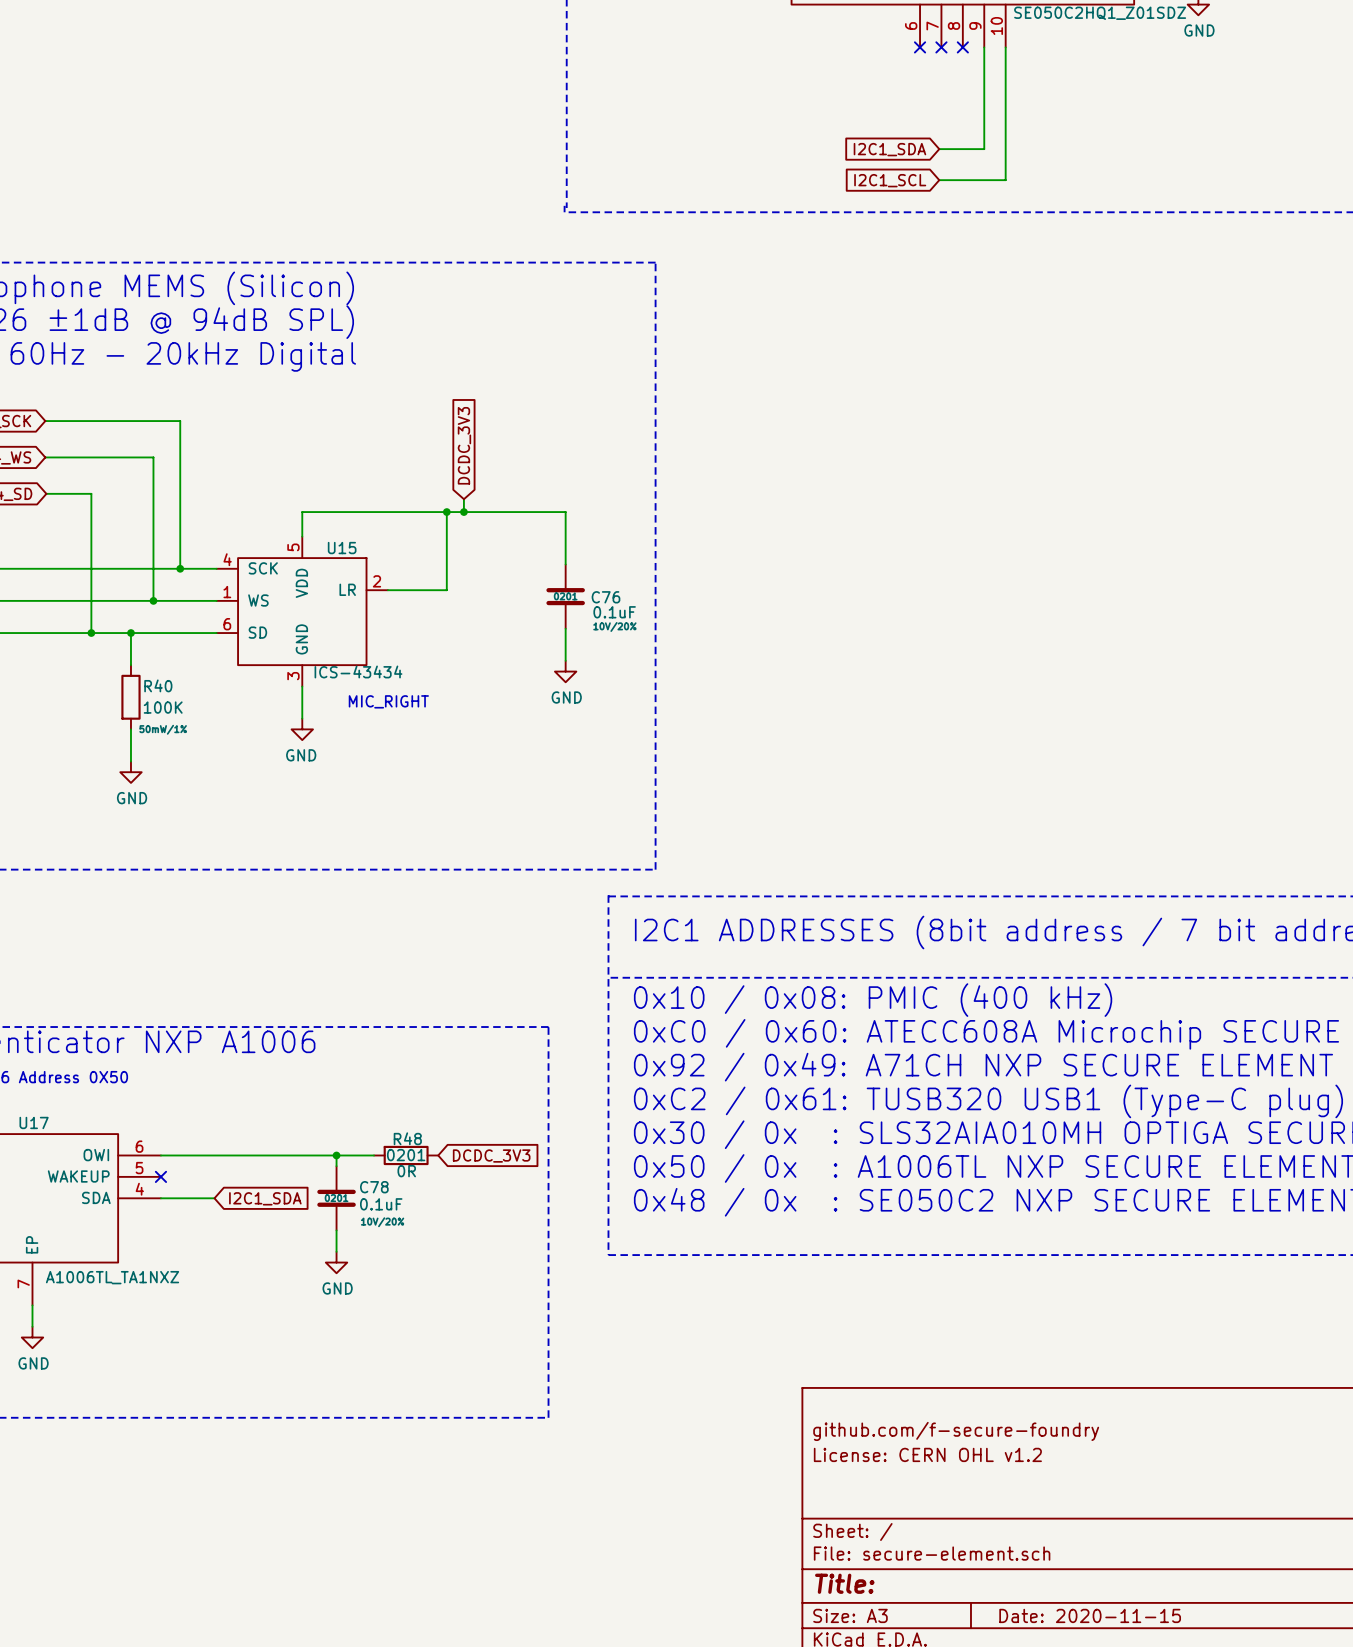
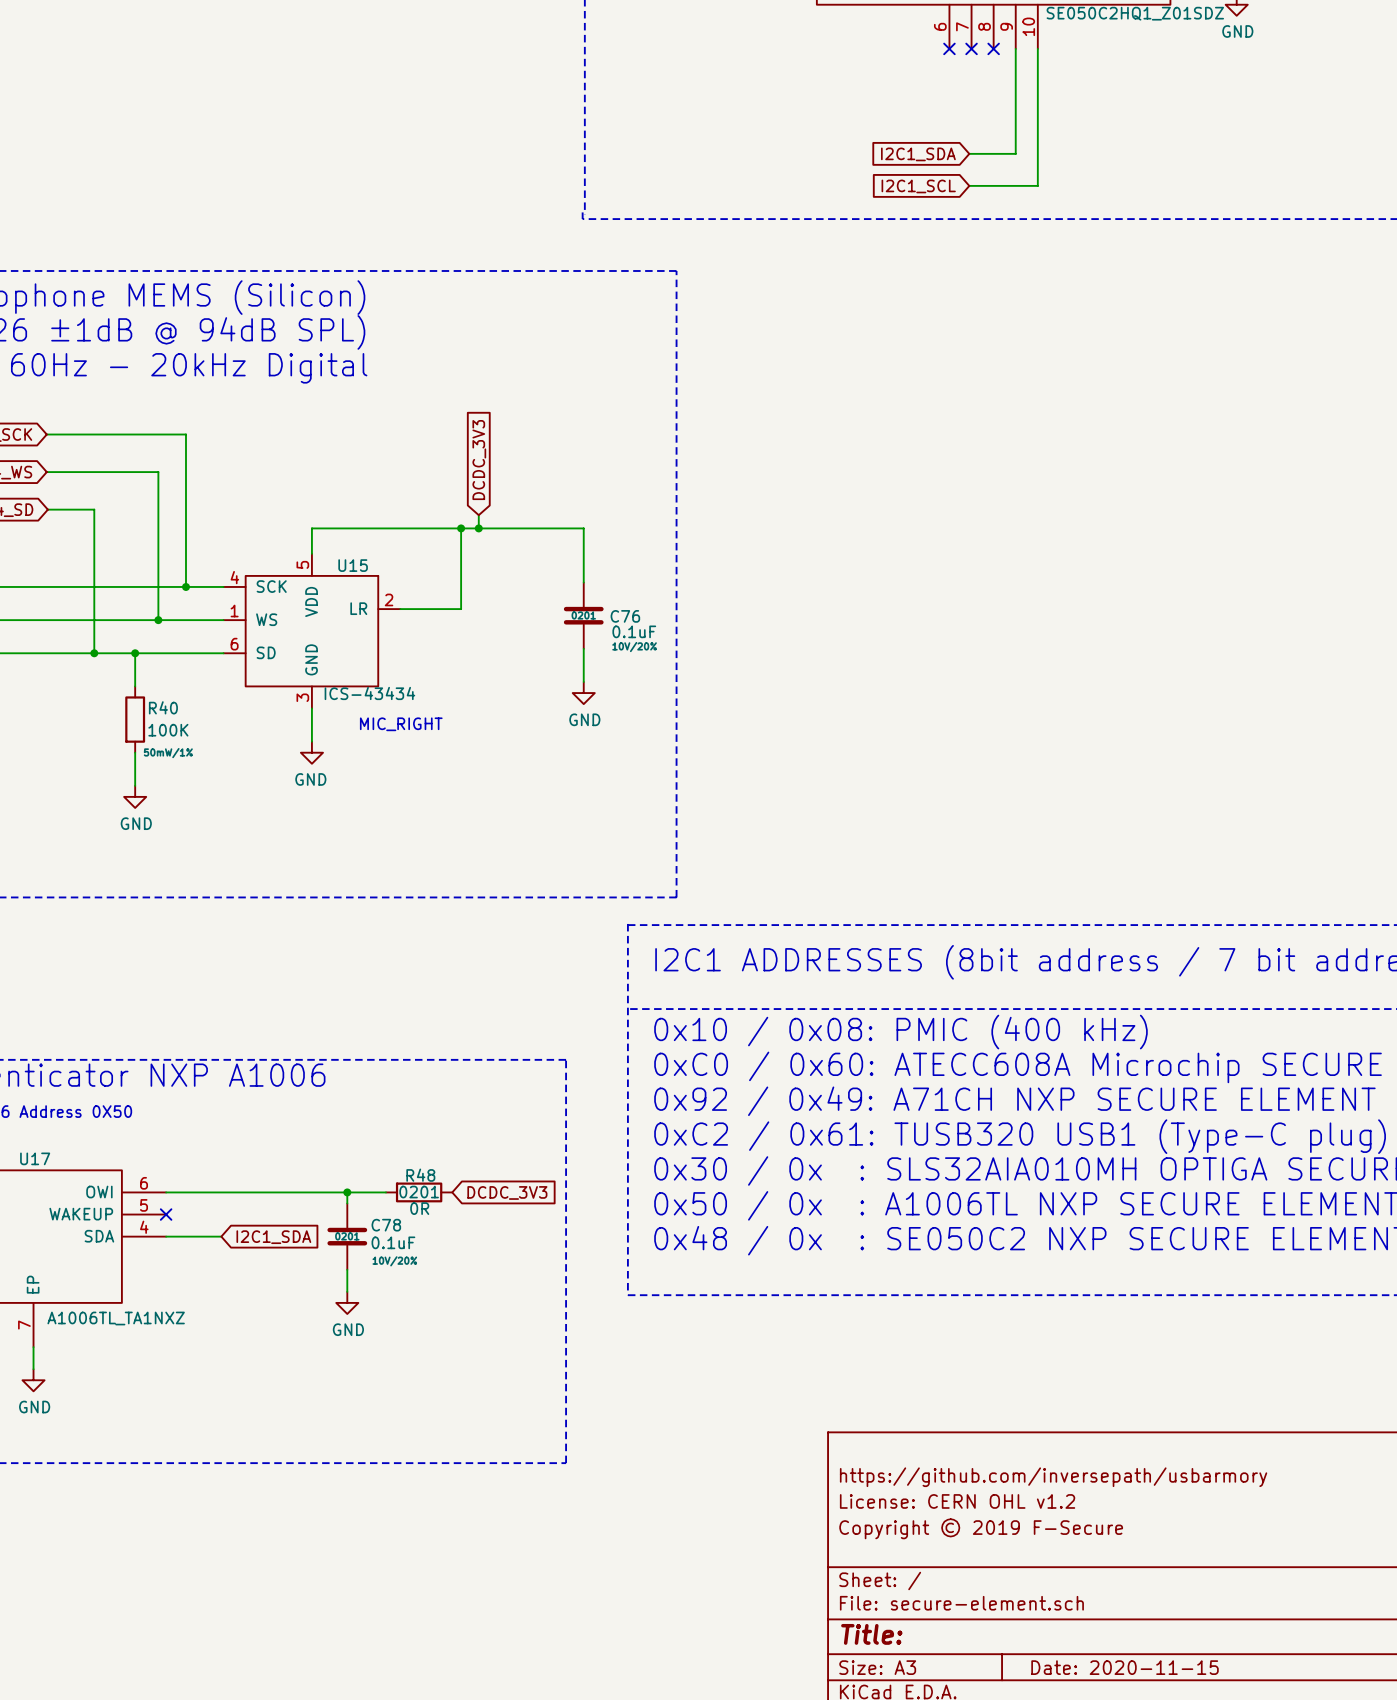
title block: github.com/f-secure-foundry (956, 1431) -> https://github.com/inversepath/usbarmory (1053, 1477)
title block: none -> Copyright © 2019 F-Secure (981, 1528)

